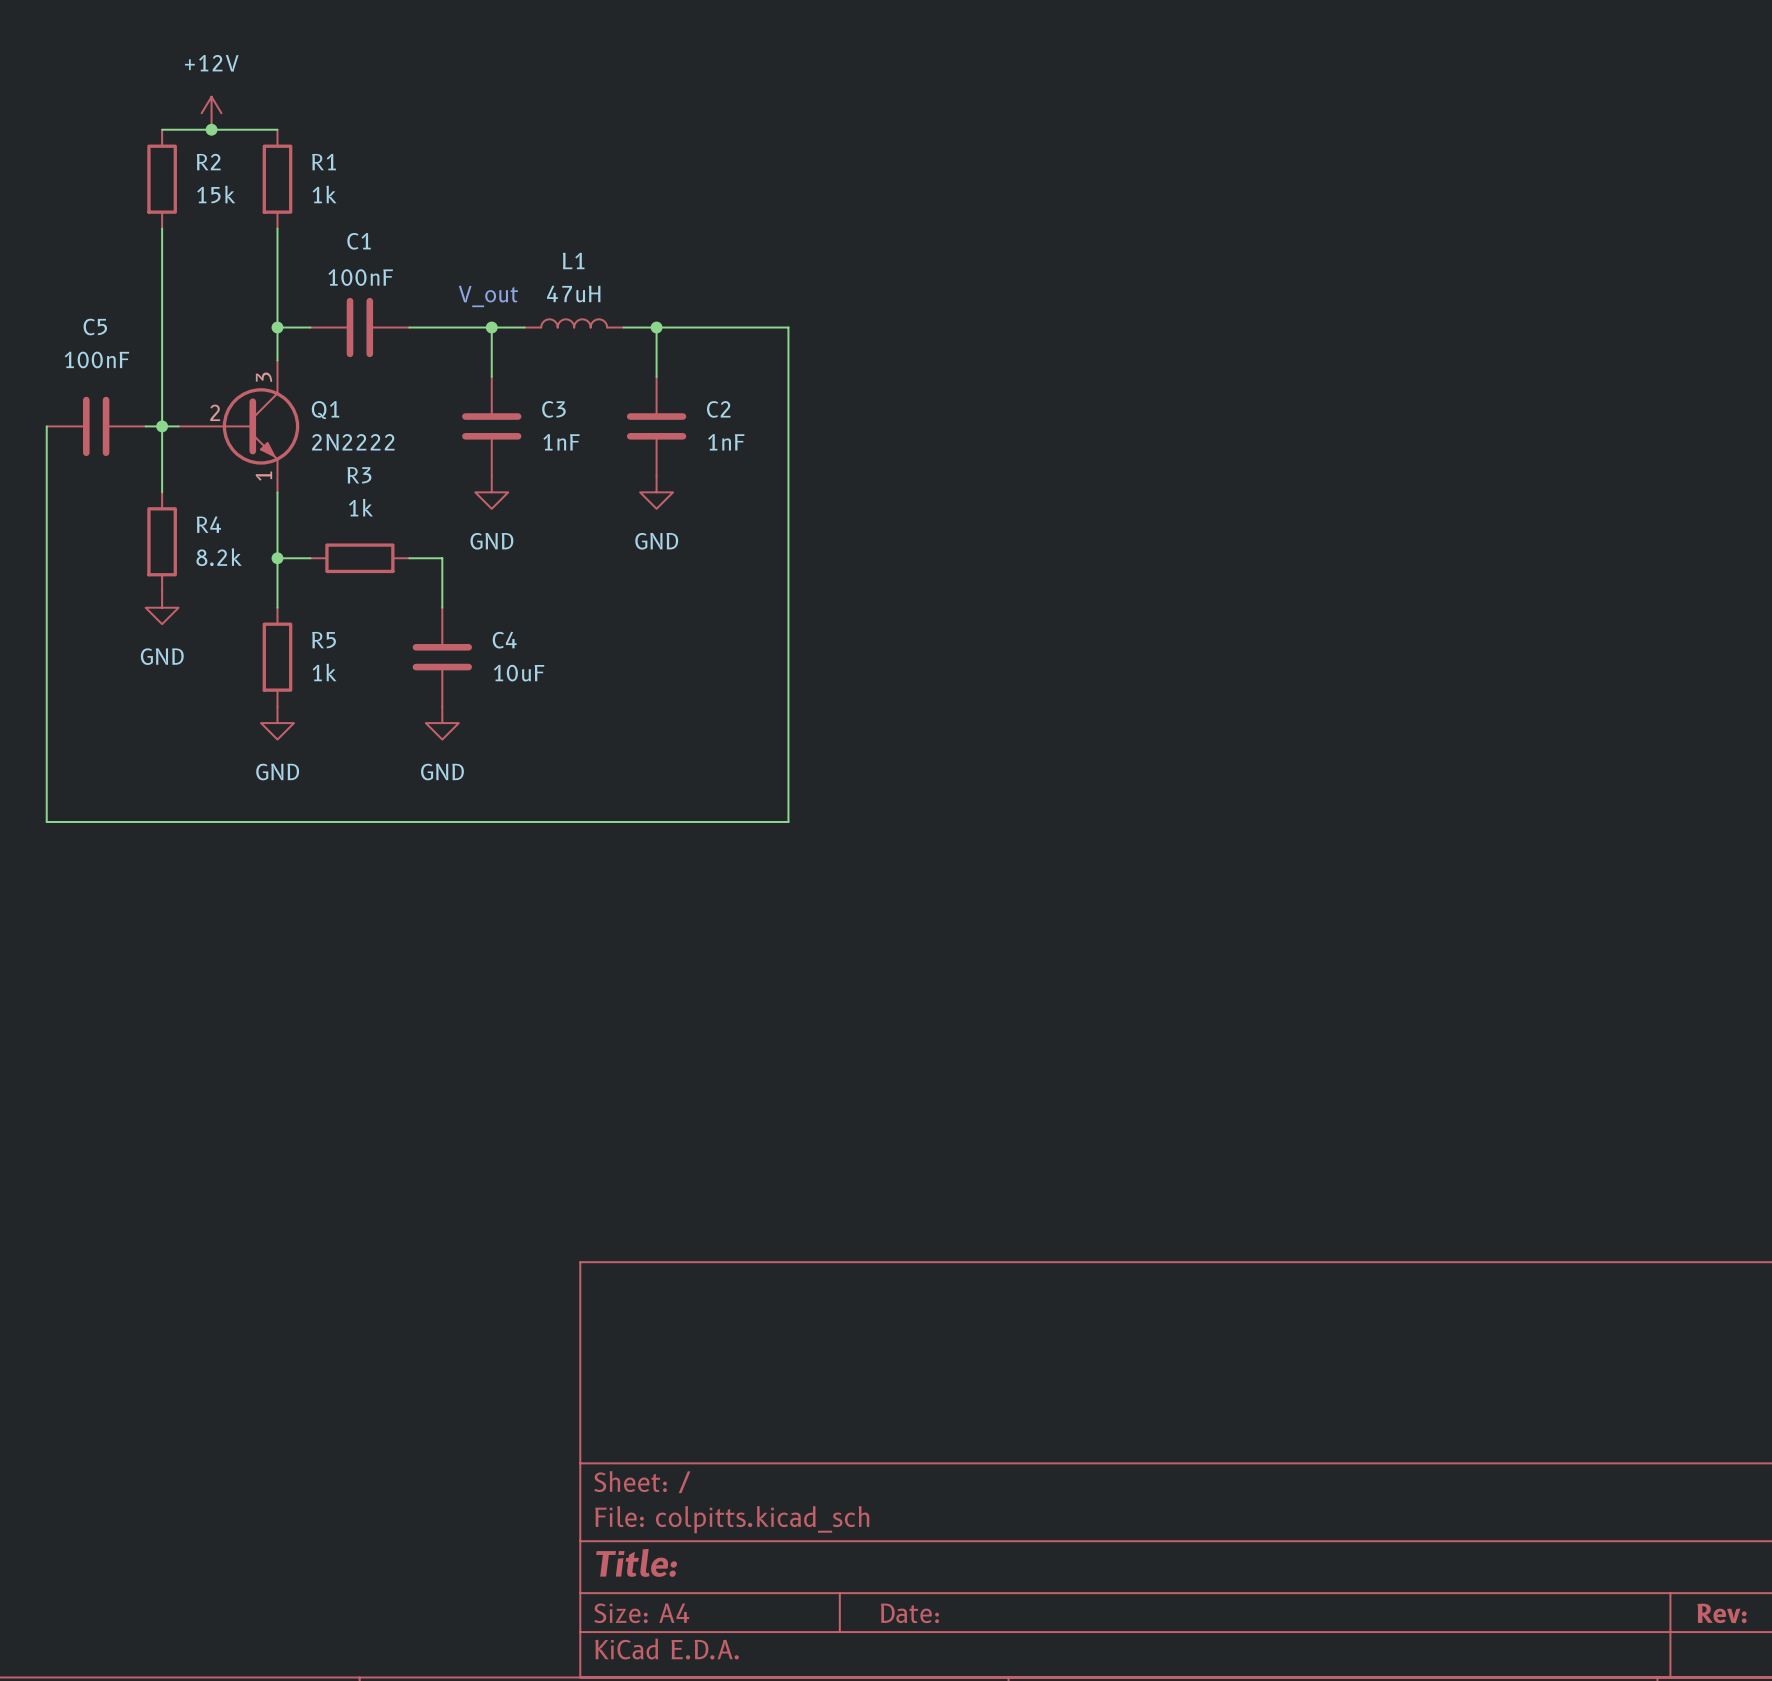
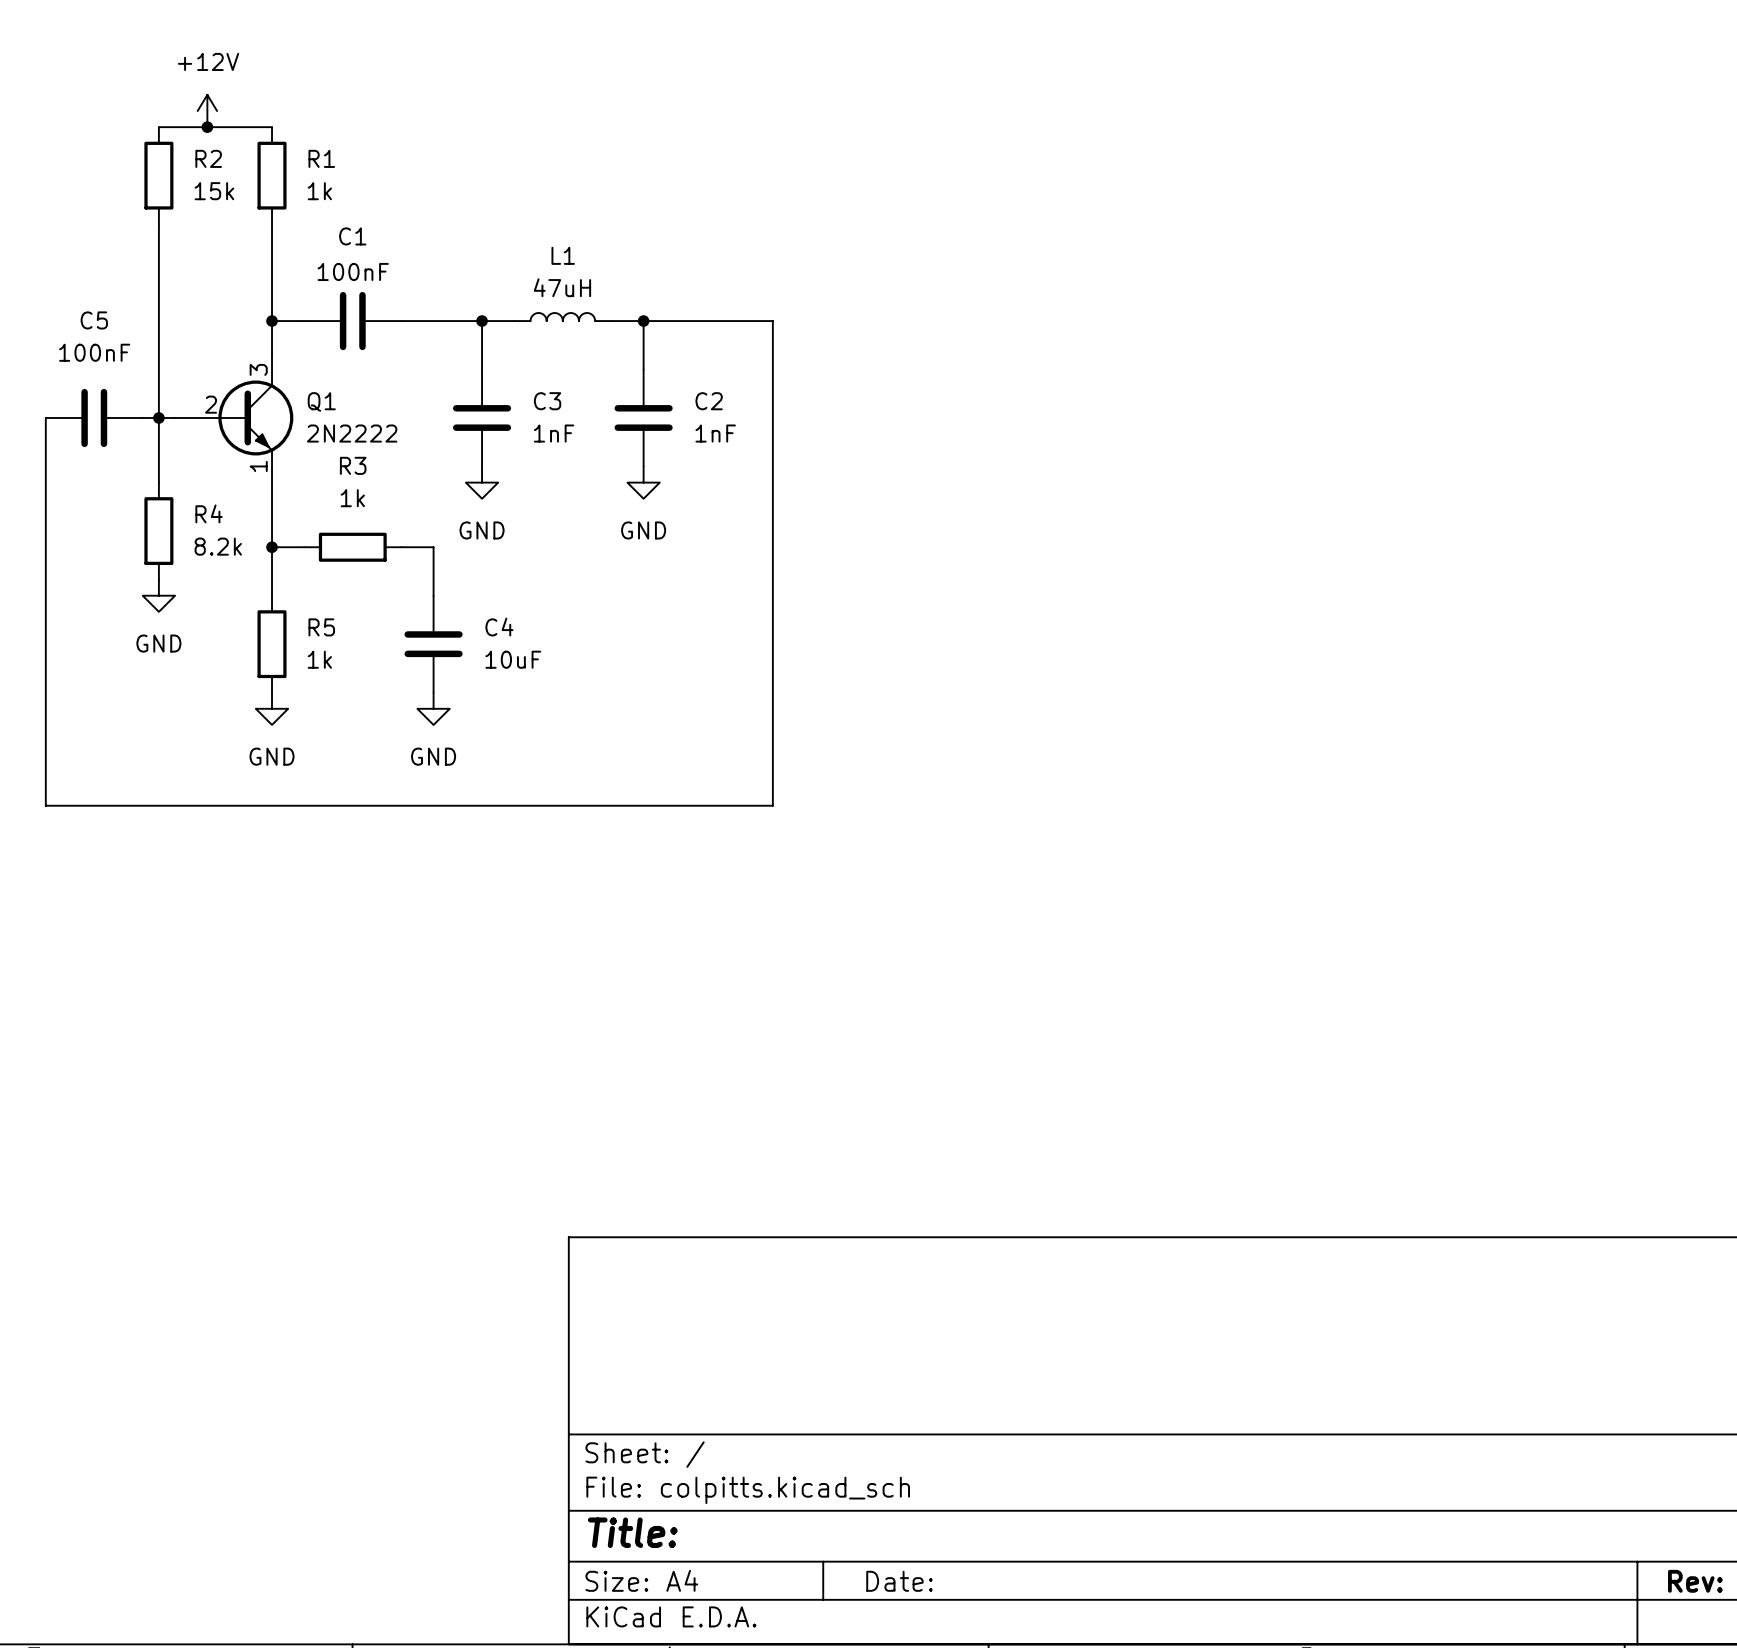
text: V_out (488, 296) -> none

